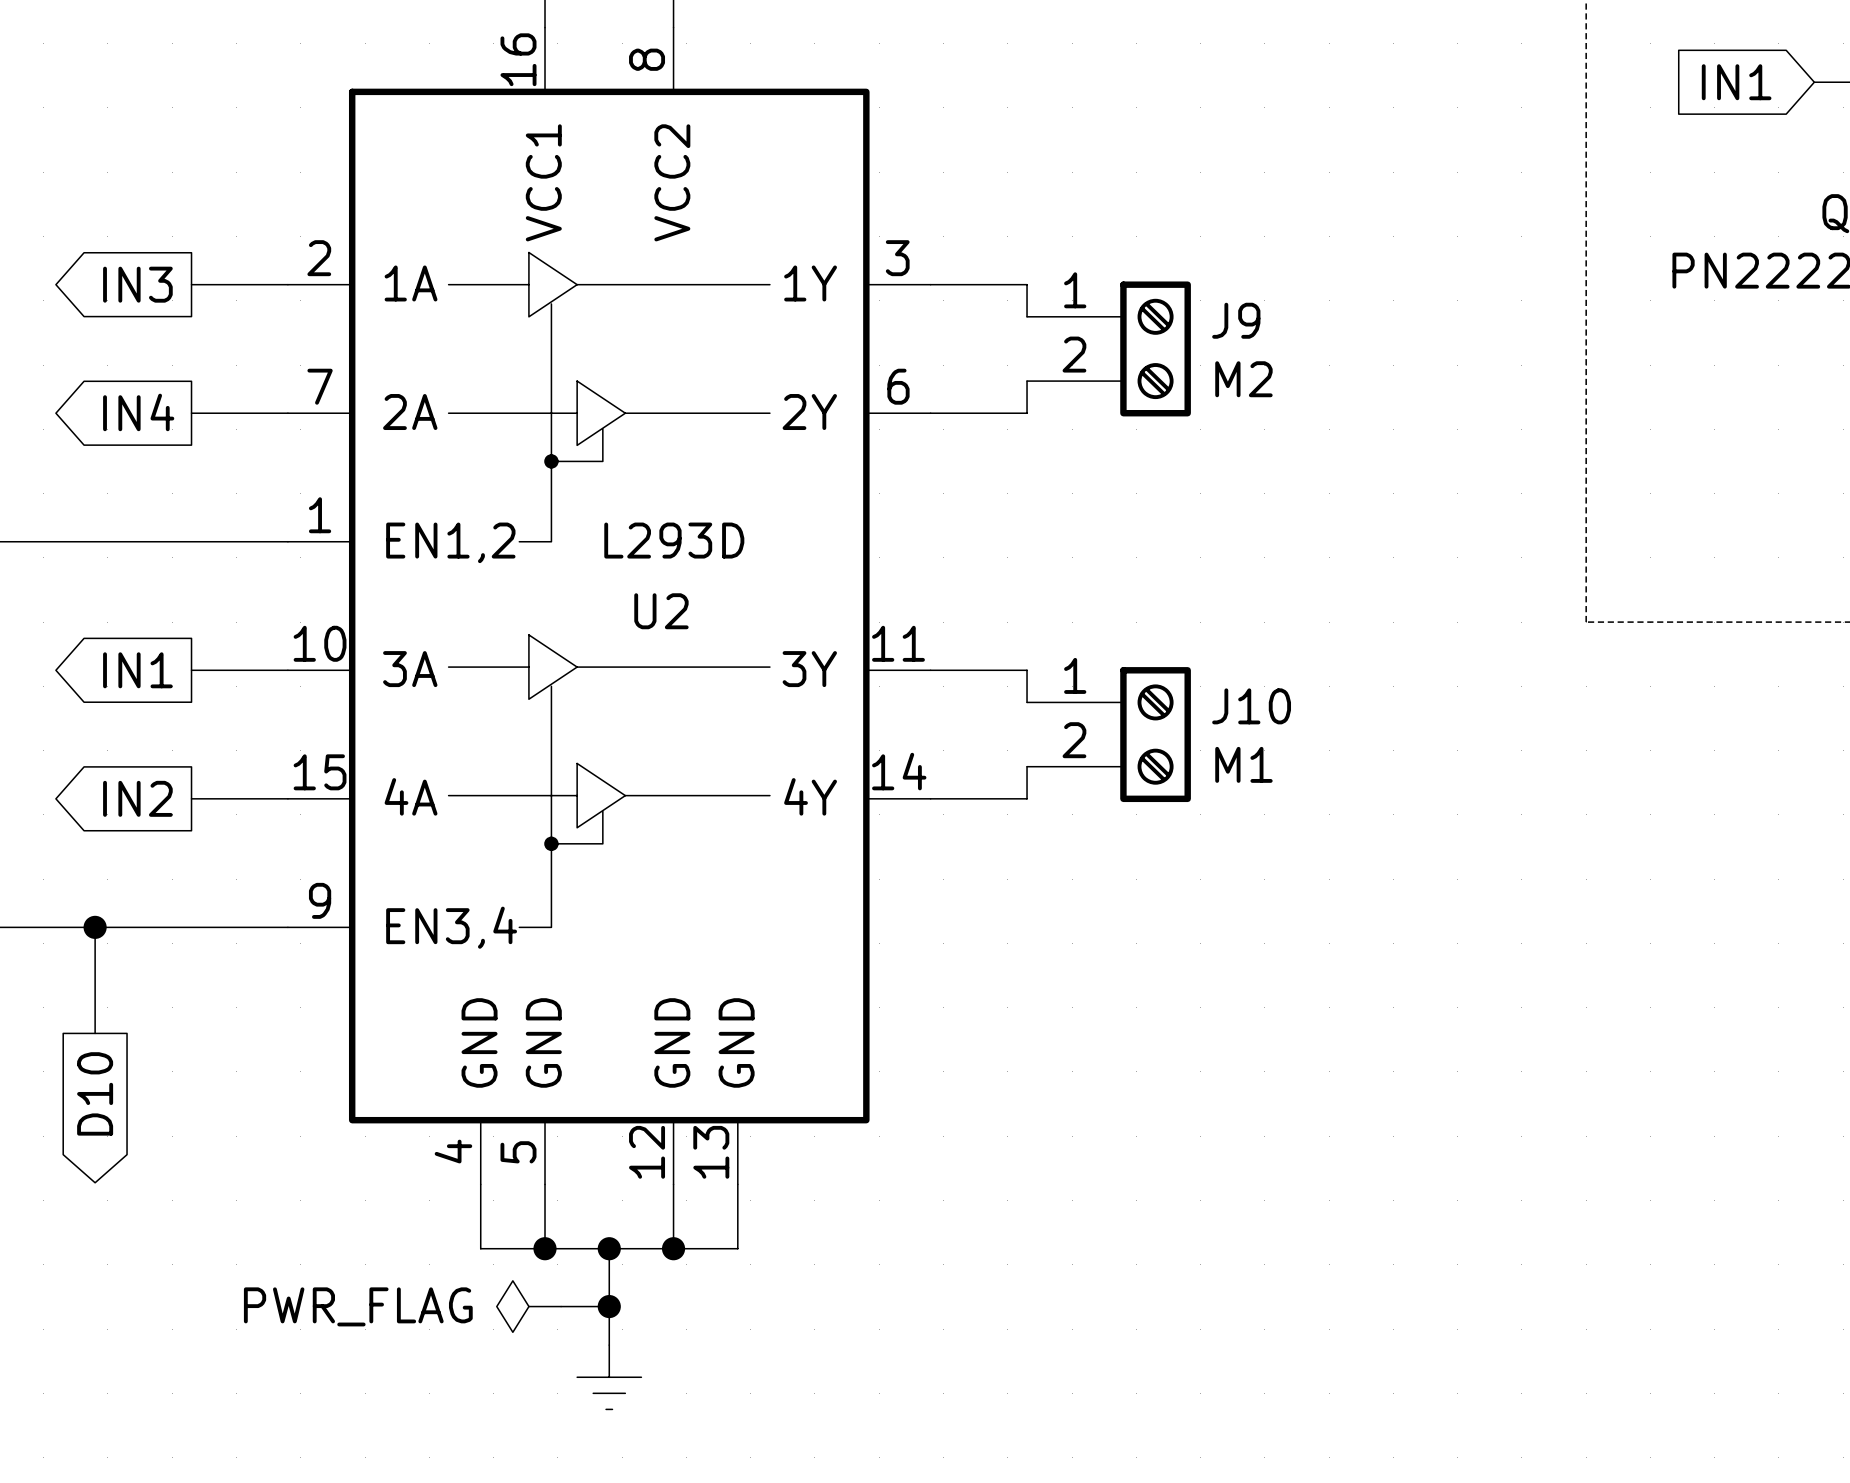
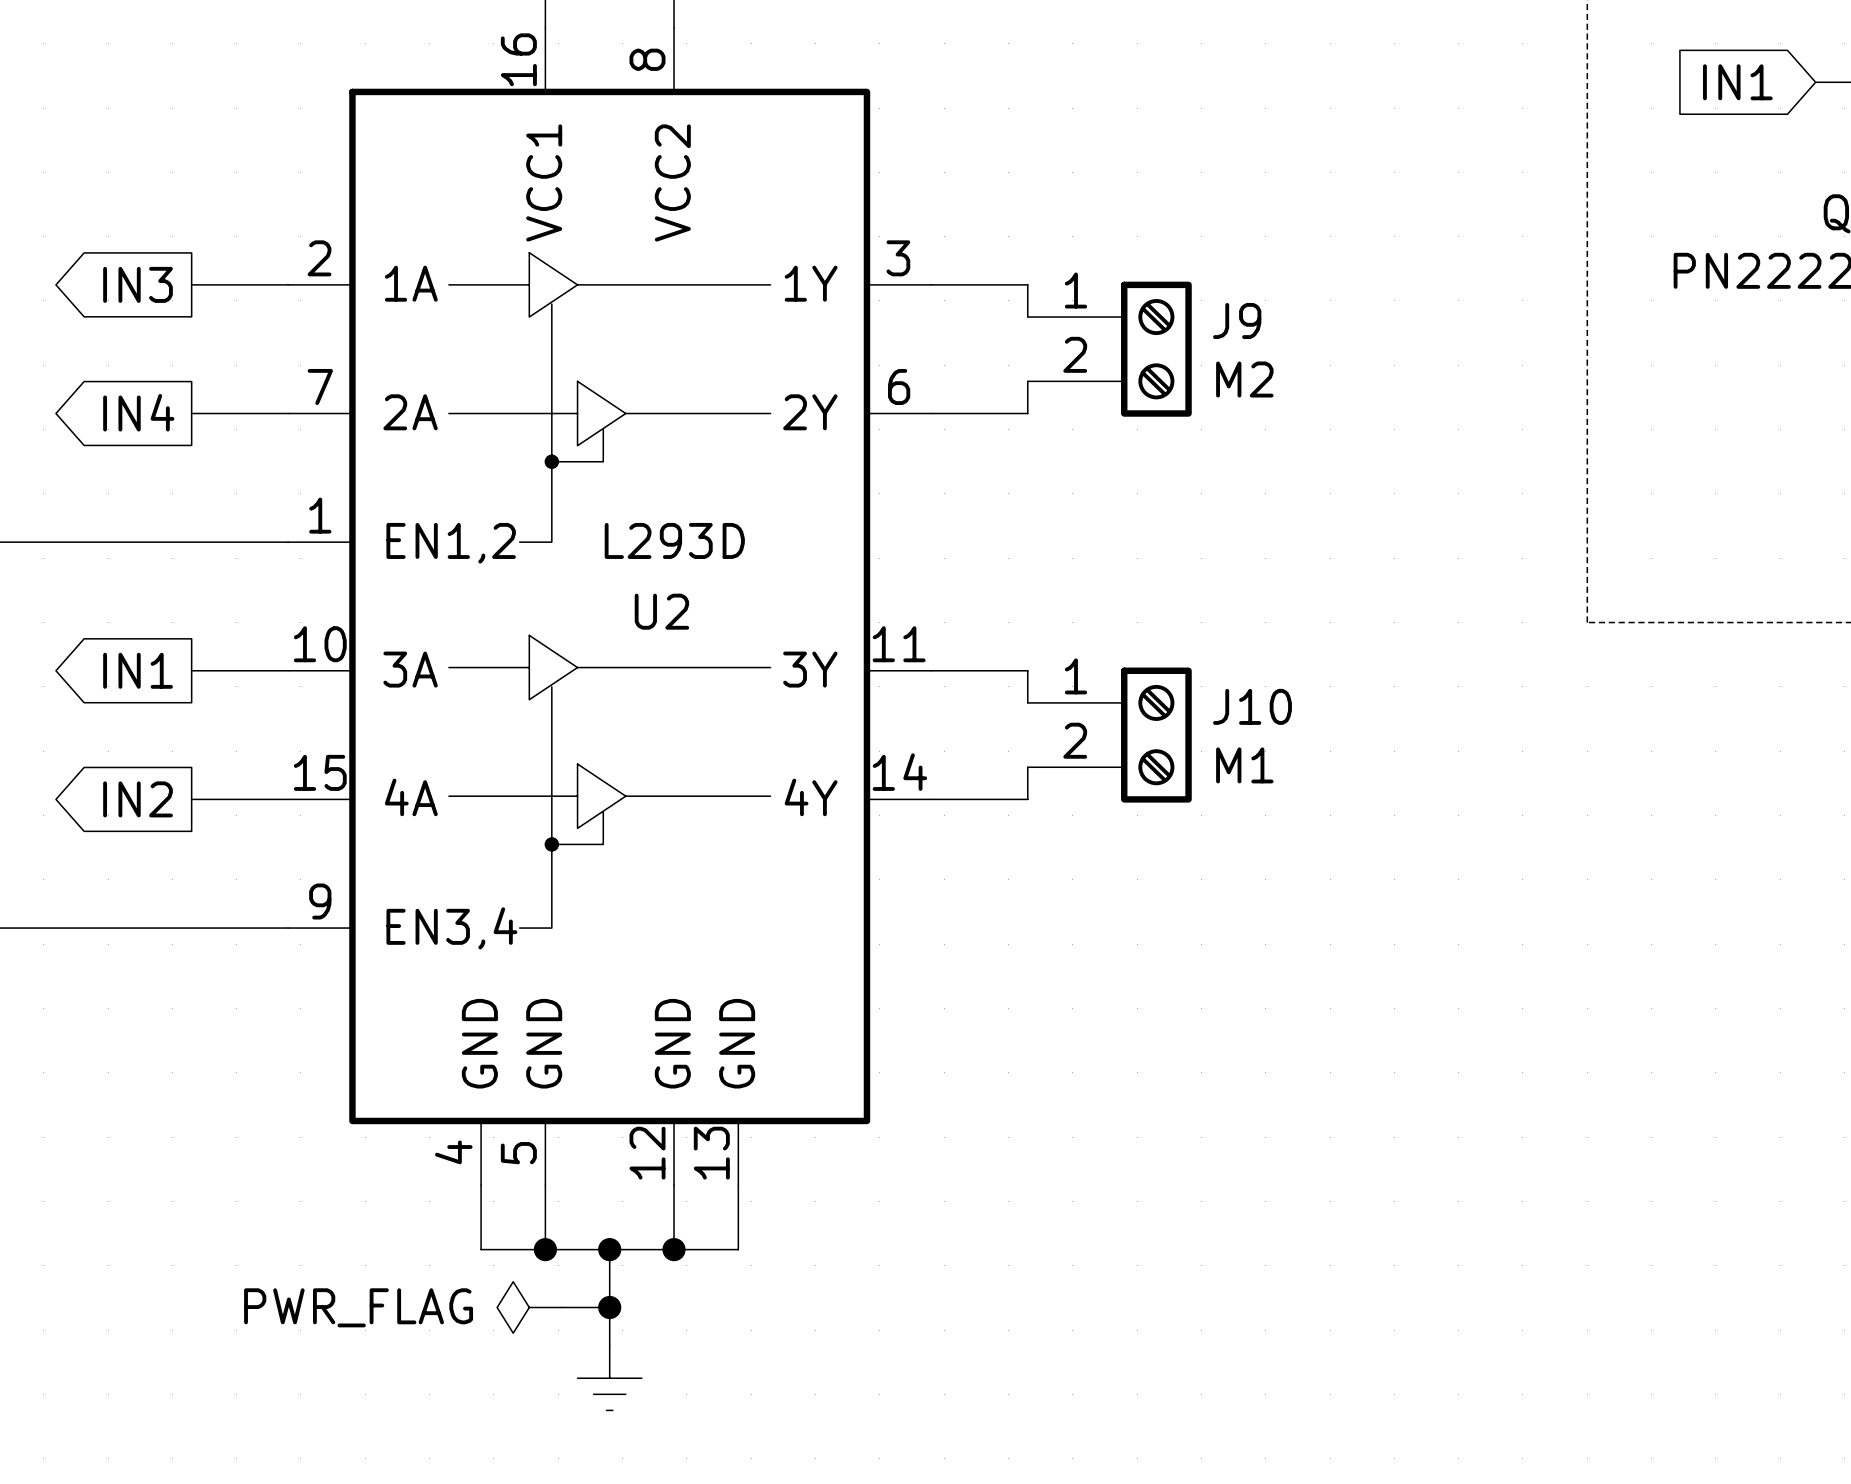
wire: (95, 927) (95, 1033) -> none
junction: (95, 927) -> none
global label: D10 (95, 1093) -> none

